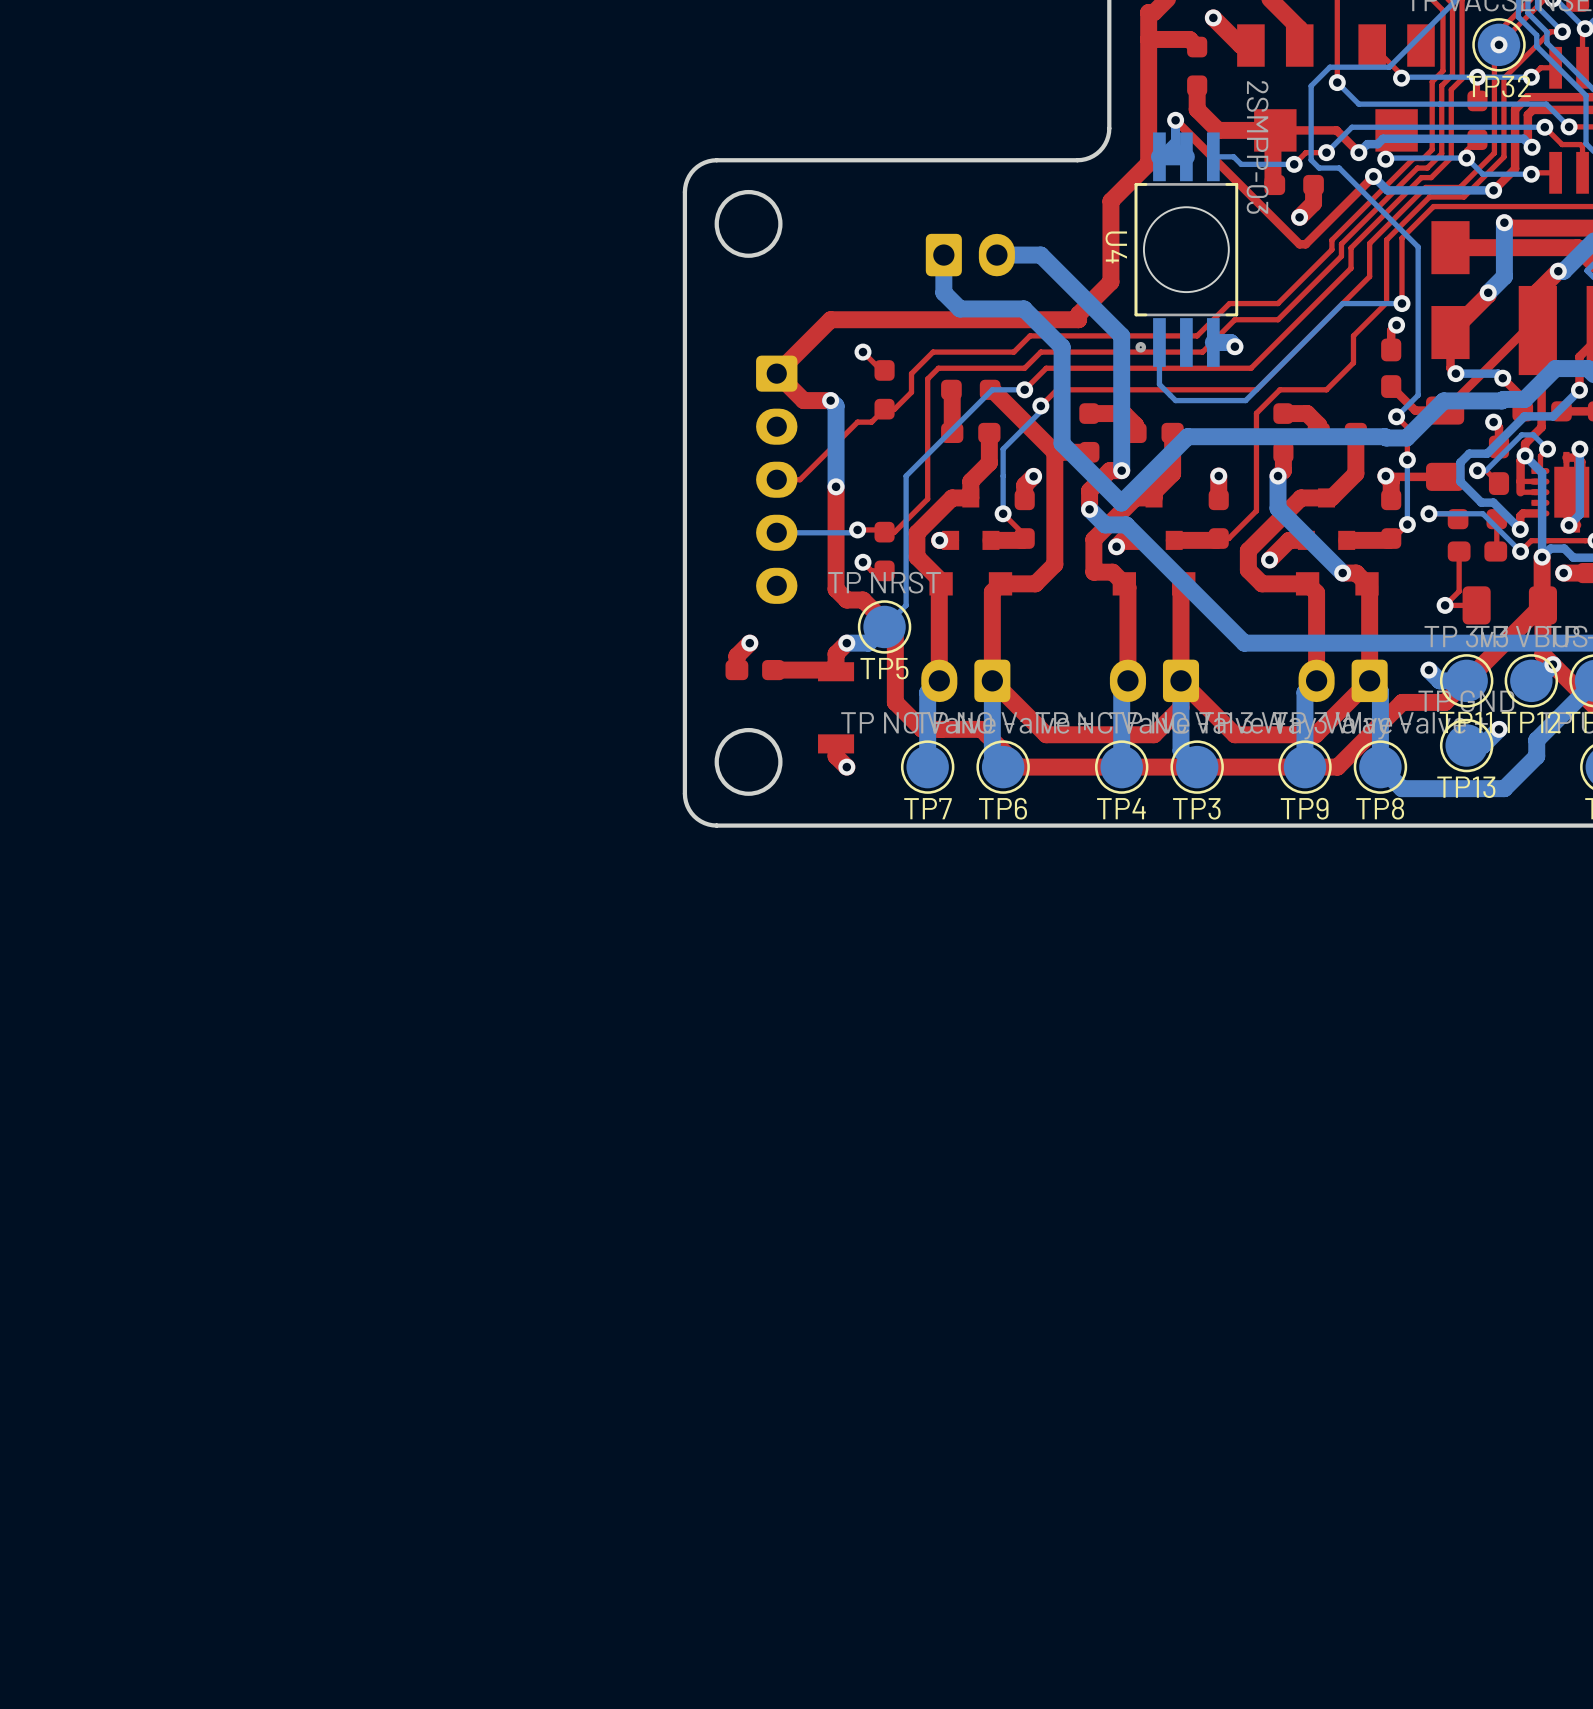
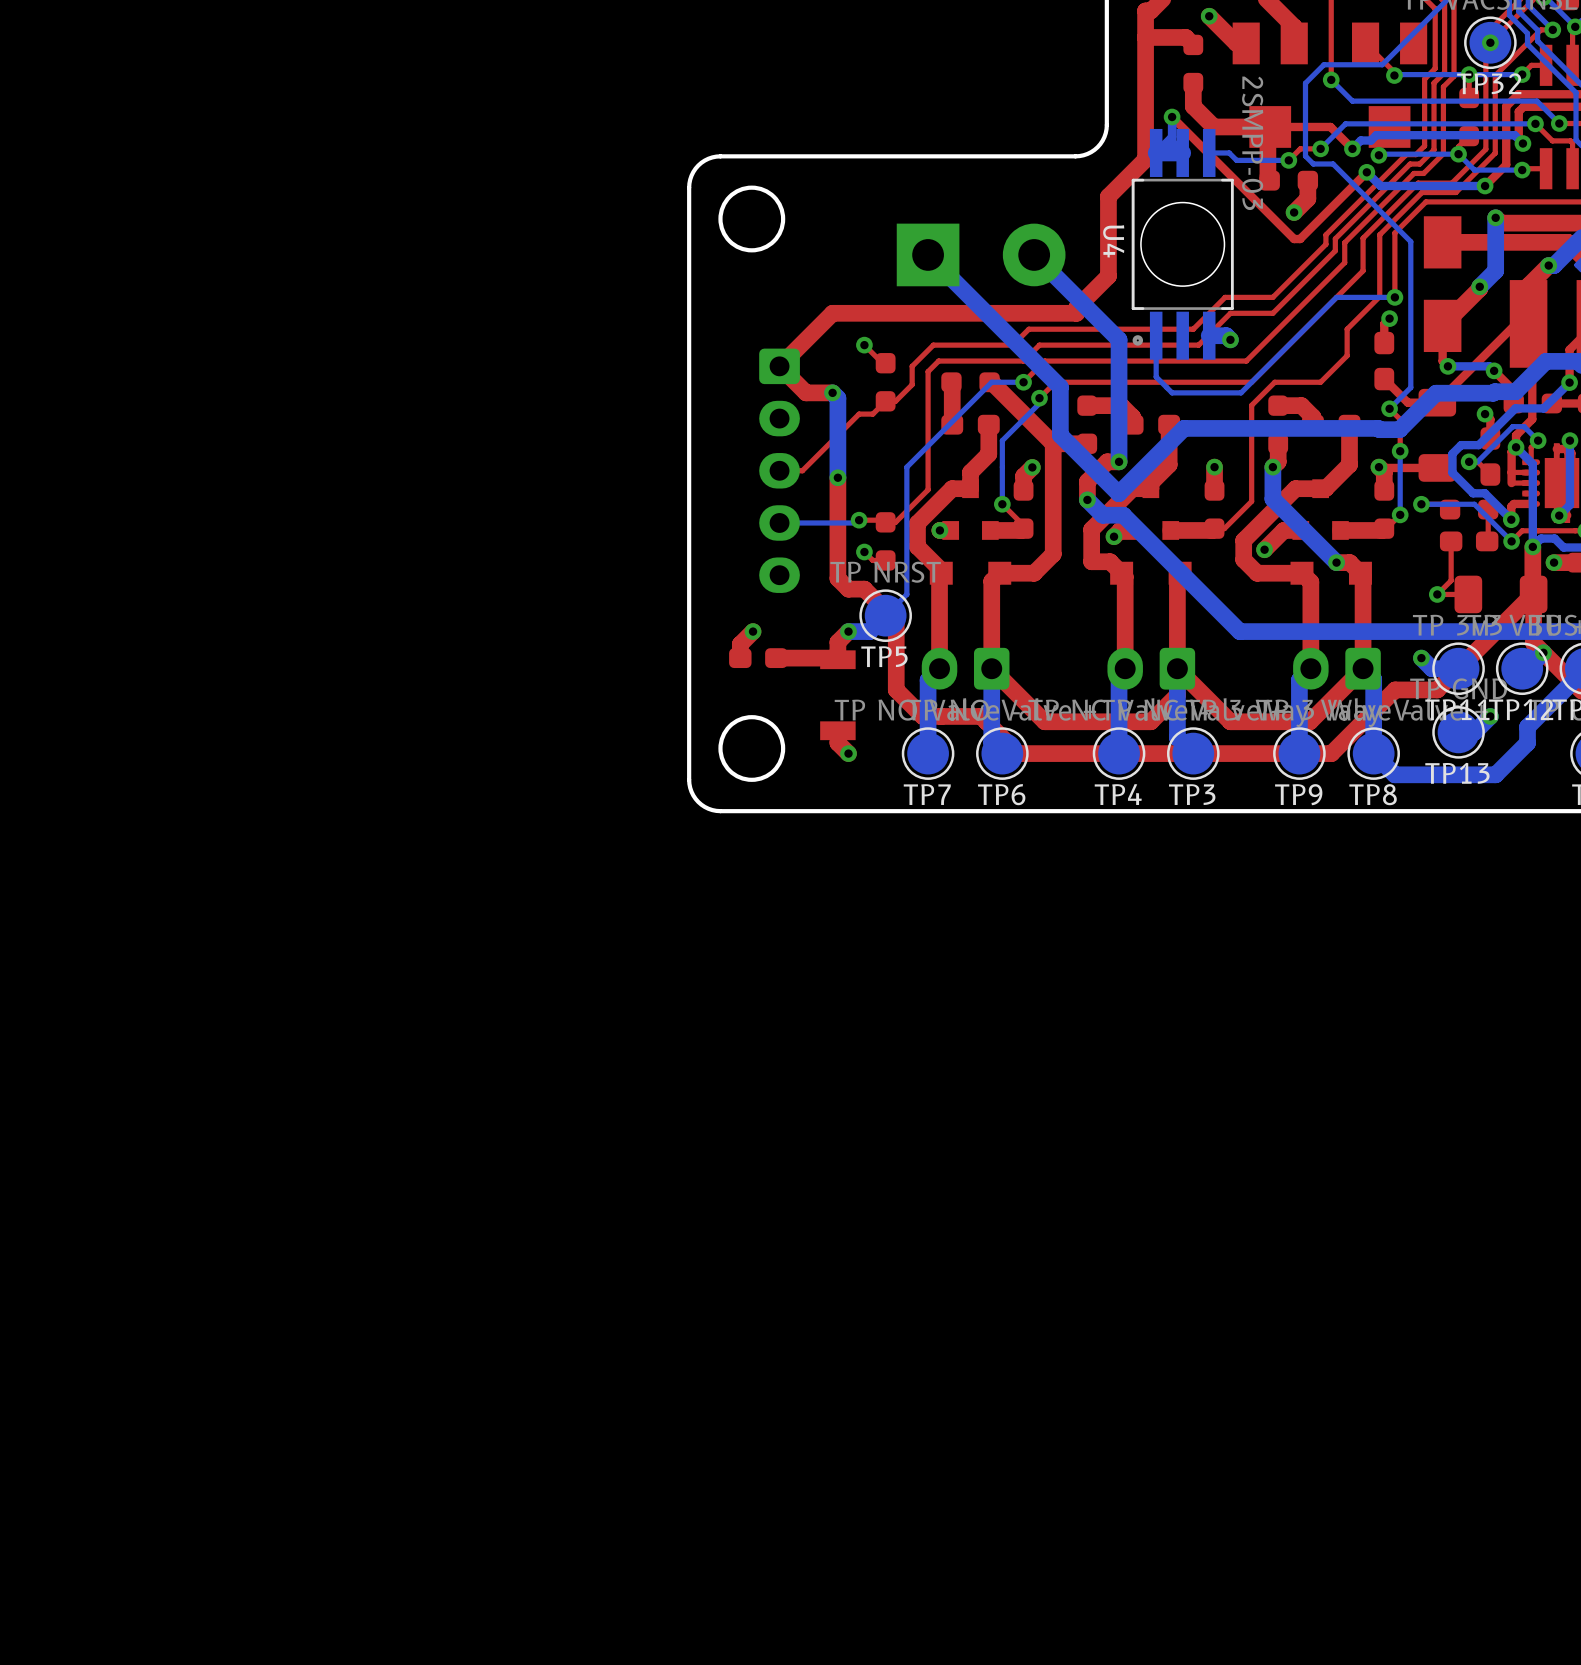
part footprint: [925, 233, 1015, 277] -> [896, 223, 1066, 287]
bottom track: (943, 255) (943, 292) (960, 308) (1024, 308) (1062, 347) (1062, 394) -> (928, 254) (1060, 387)
bottom track: (996, 255) (1040, 255) (1121, 335) (1121, 346) -> (1034, 254) (1119, 339)

